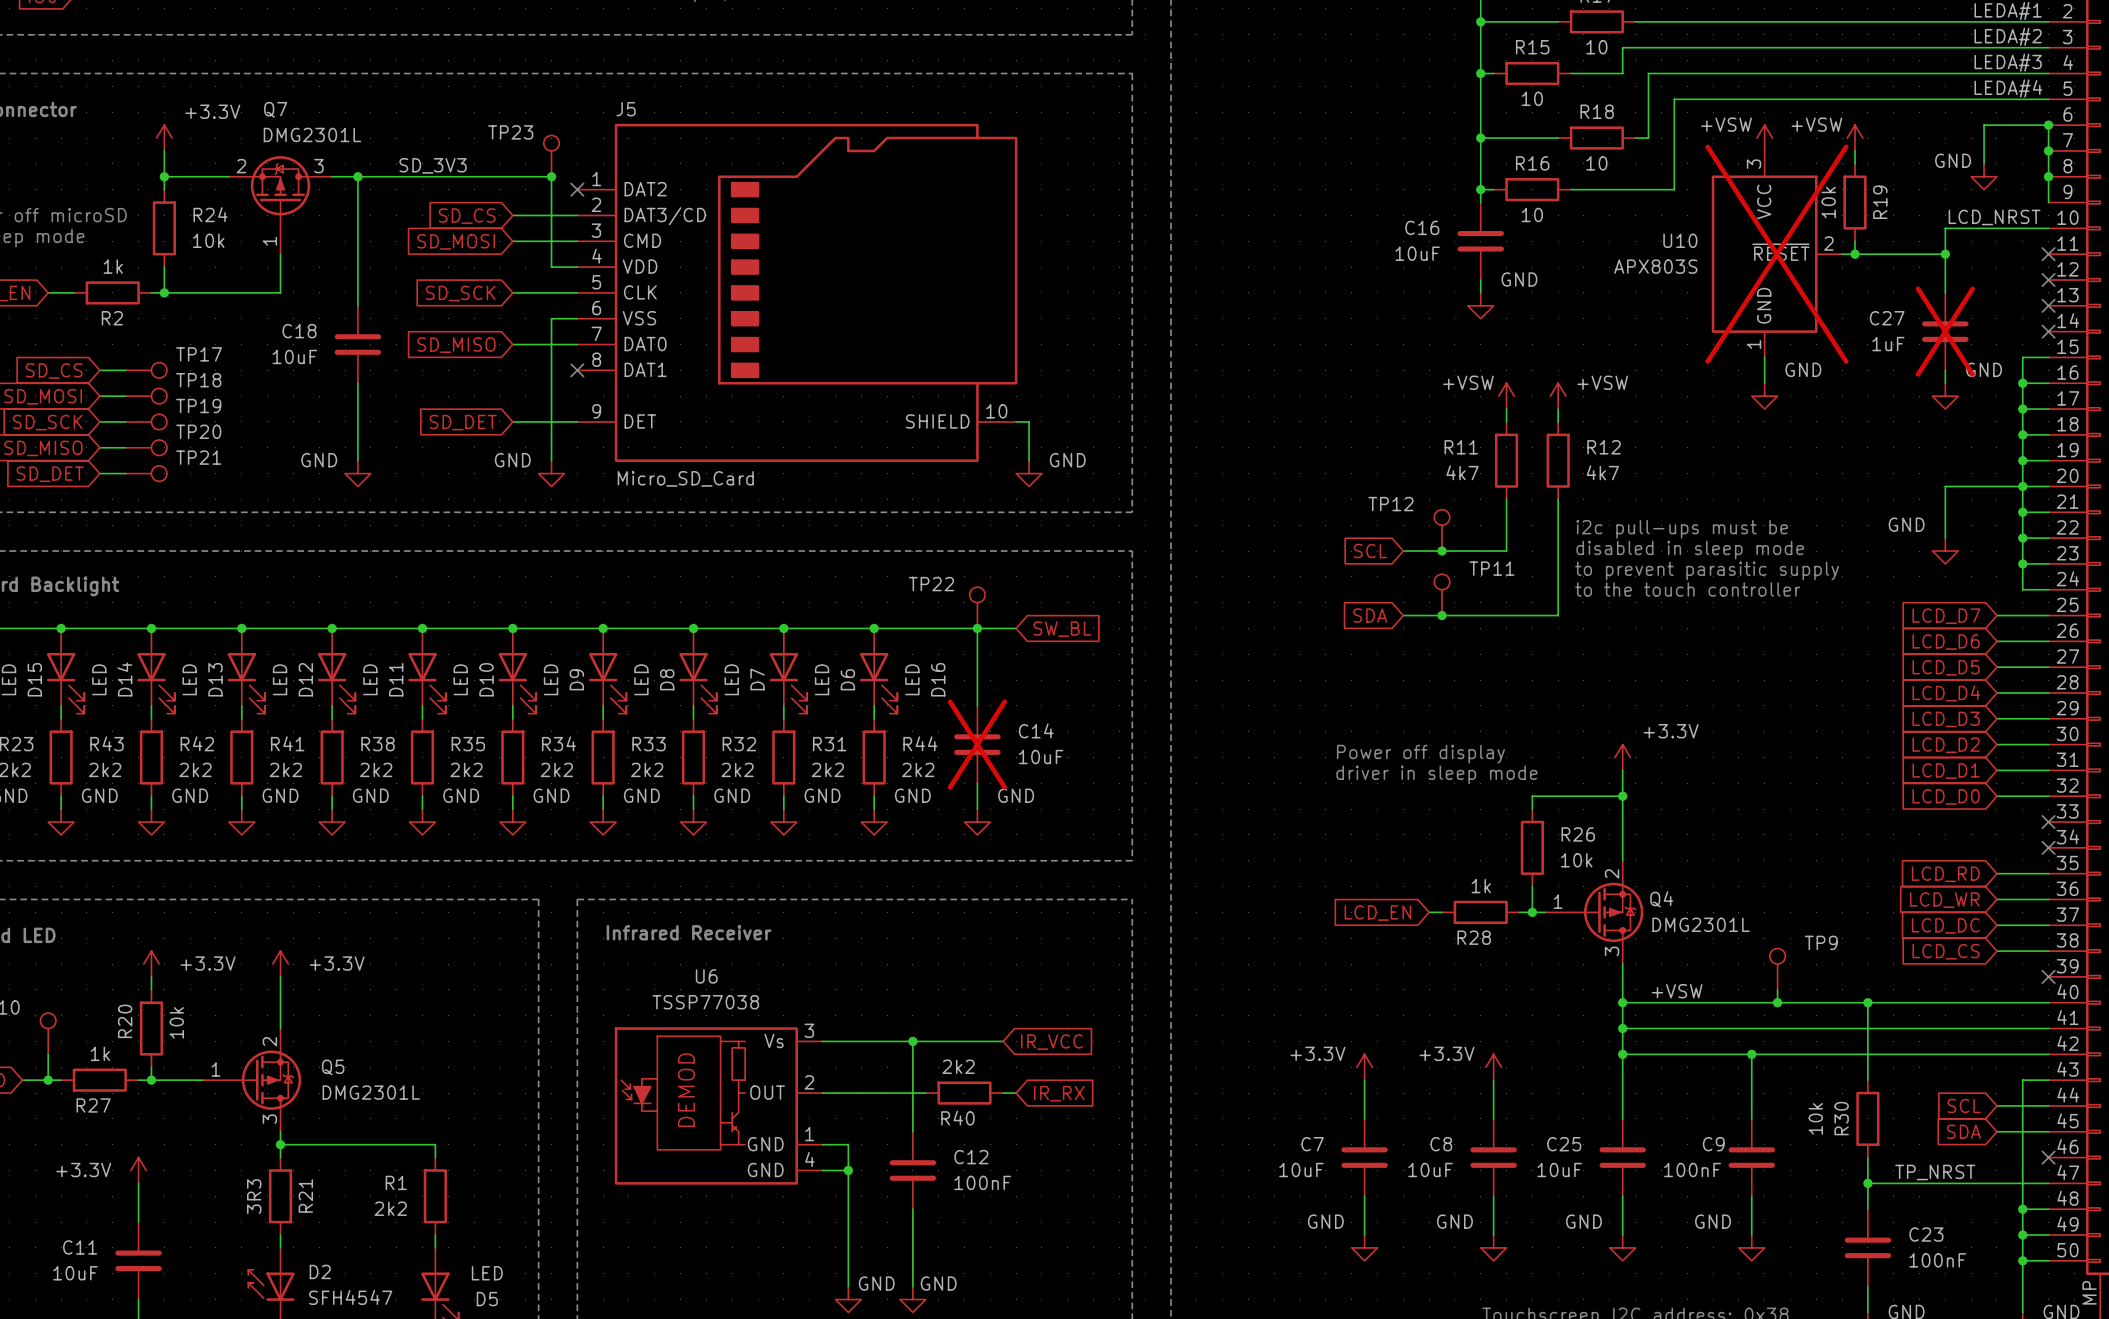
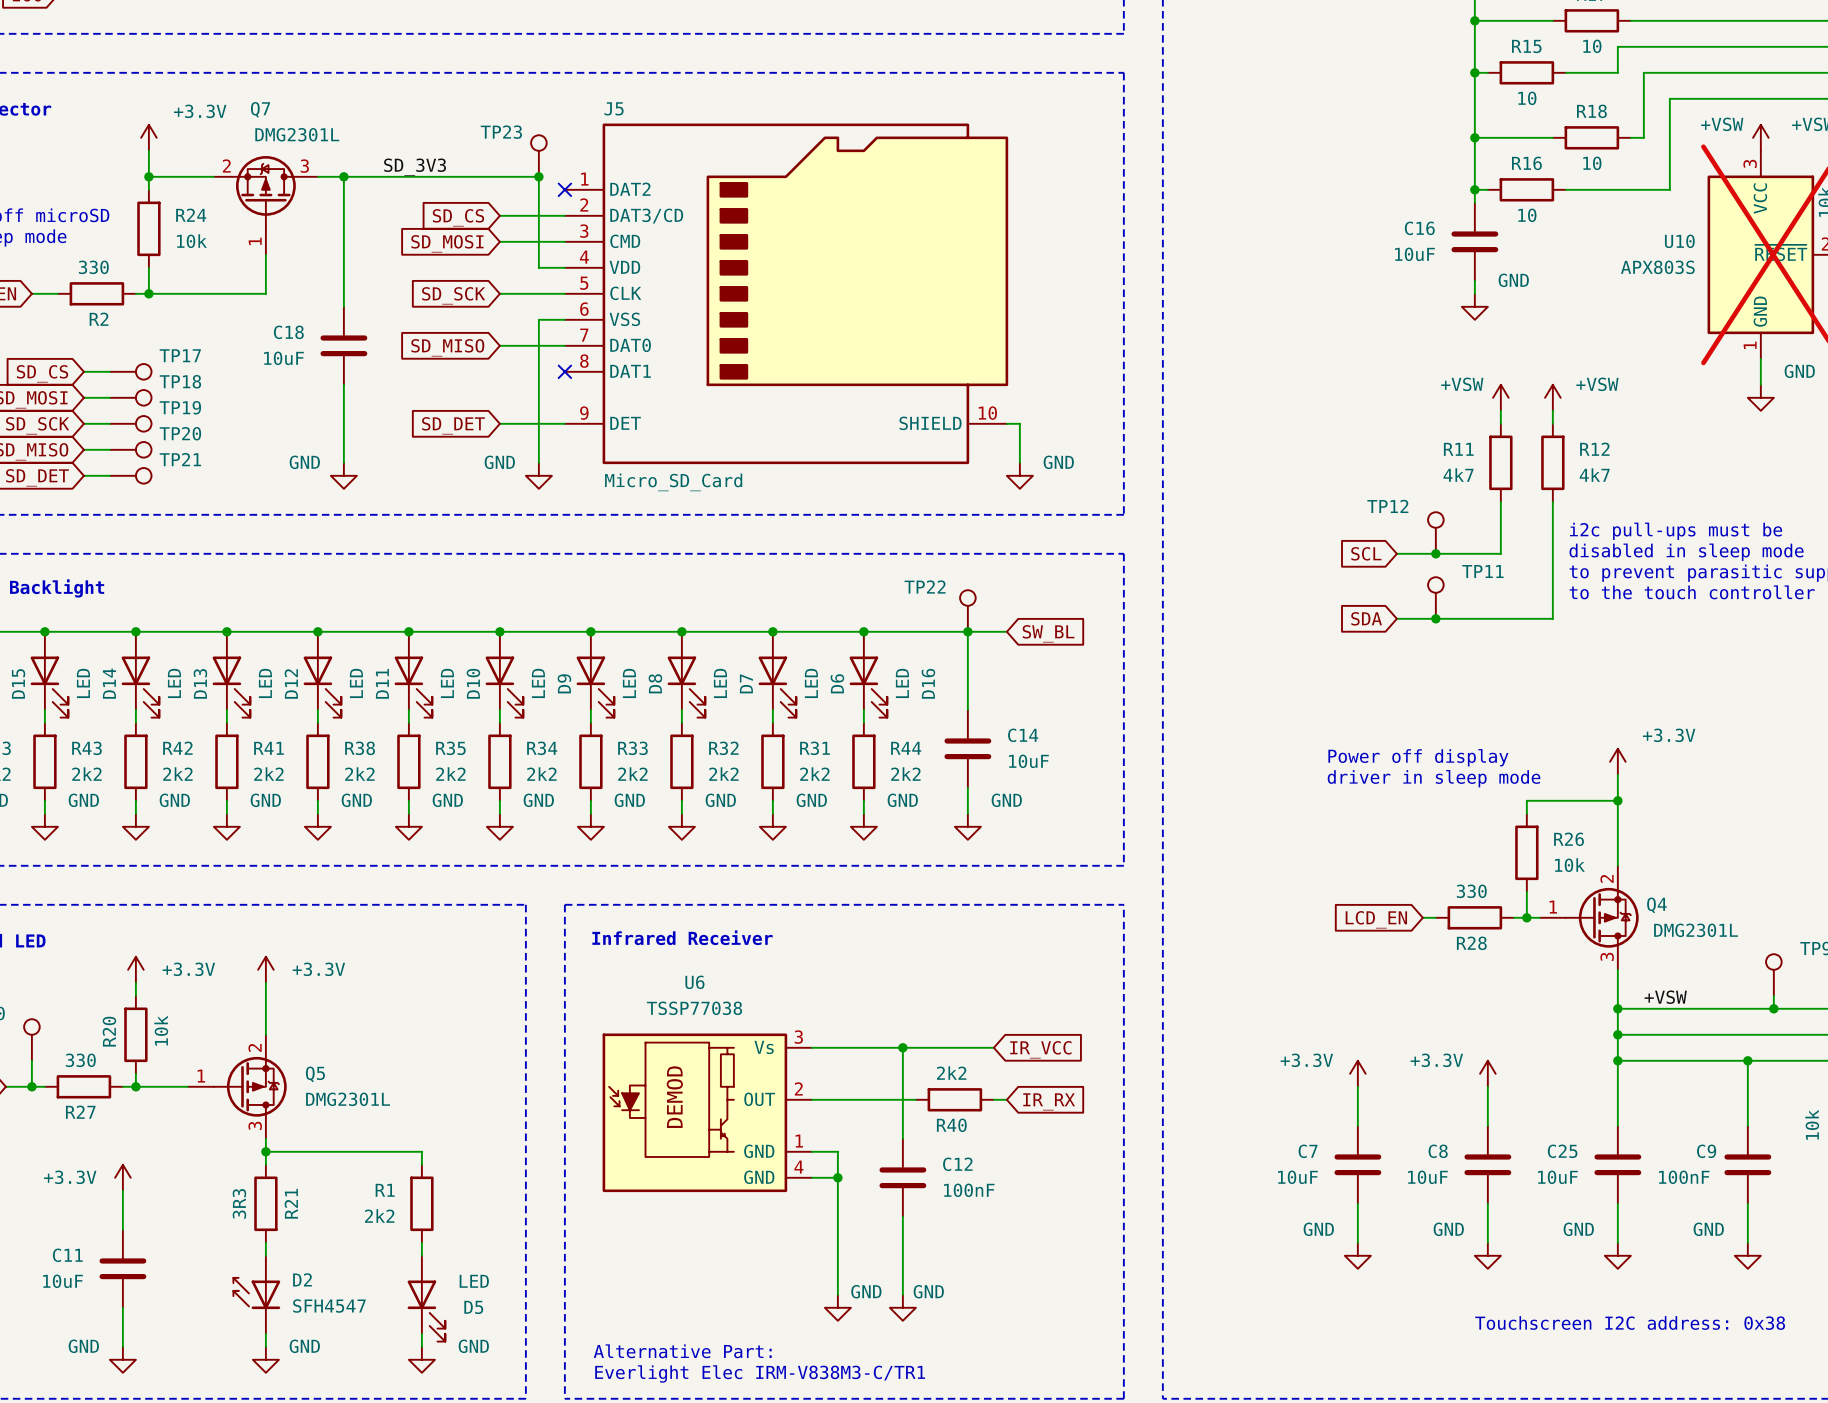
R2 value: 1k (113, 266) -> 330 (93, 267)
C14 do-not-place cross: (977, 744) -> none
R28 value: 1k (1481, 886) -> 330 (1471, 891)
R27 value: 1k (100, 1053) -> 330 (80, 1060)

